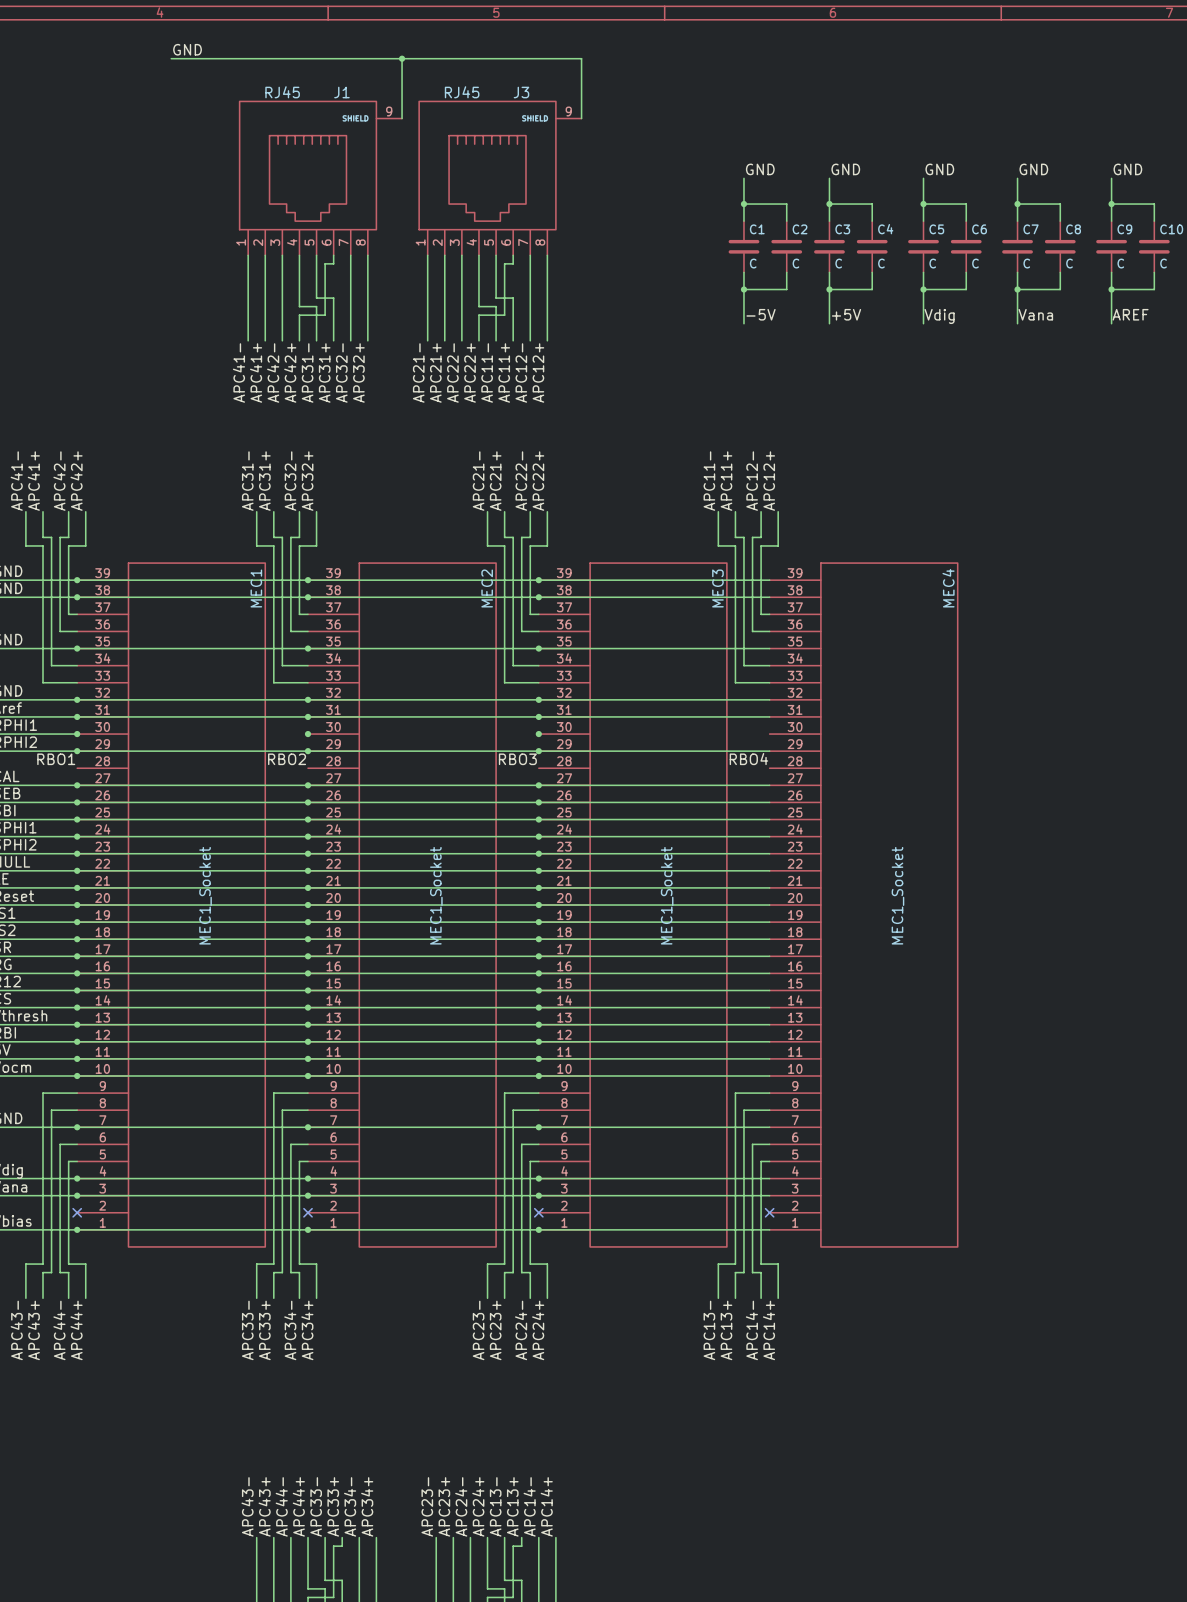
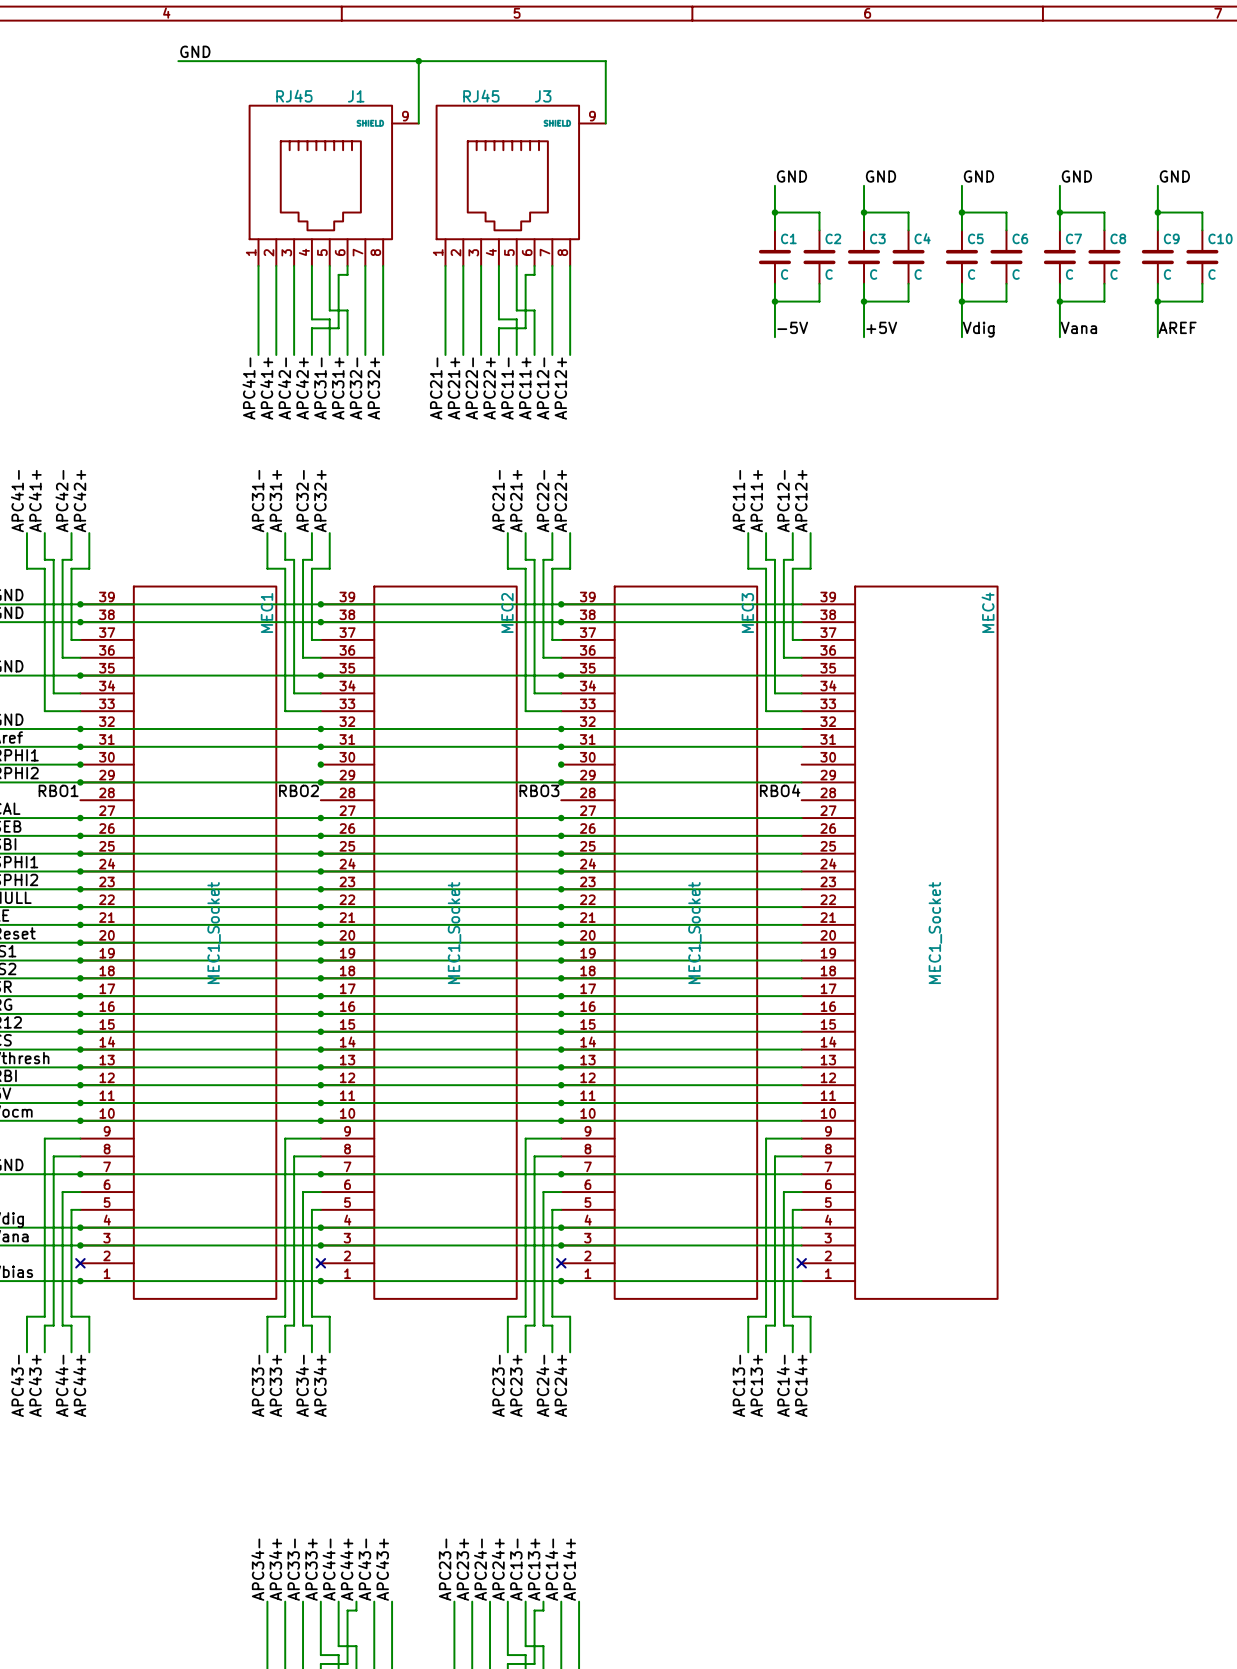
label: APC43- (247, 1506) -> APC34- (257, 1569)
label: APC43+ (264, 1506) -> APC34+ (275, 1569)
label: APC44- (281, 1506) -> APC33- (293, 1569)
label: APC44+ (298, 1506) -> APC33+ (311, 1569)
label: APC33- (316, 1506) -> APC44- (329, 1569)
label: APC33+ (333, 1506) -> APC44+ (346, 1569)
label: APC34- (350, 1506) -> APC43- (364, 1569)
label: APC34+ (367, 1506) -> APC43+ (382, 1569)

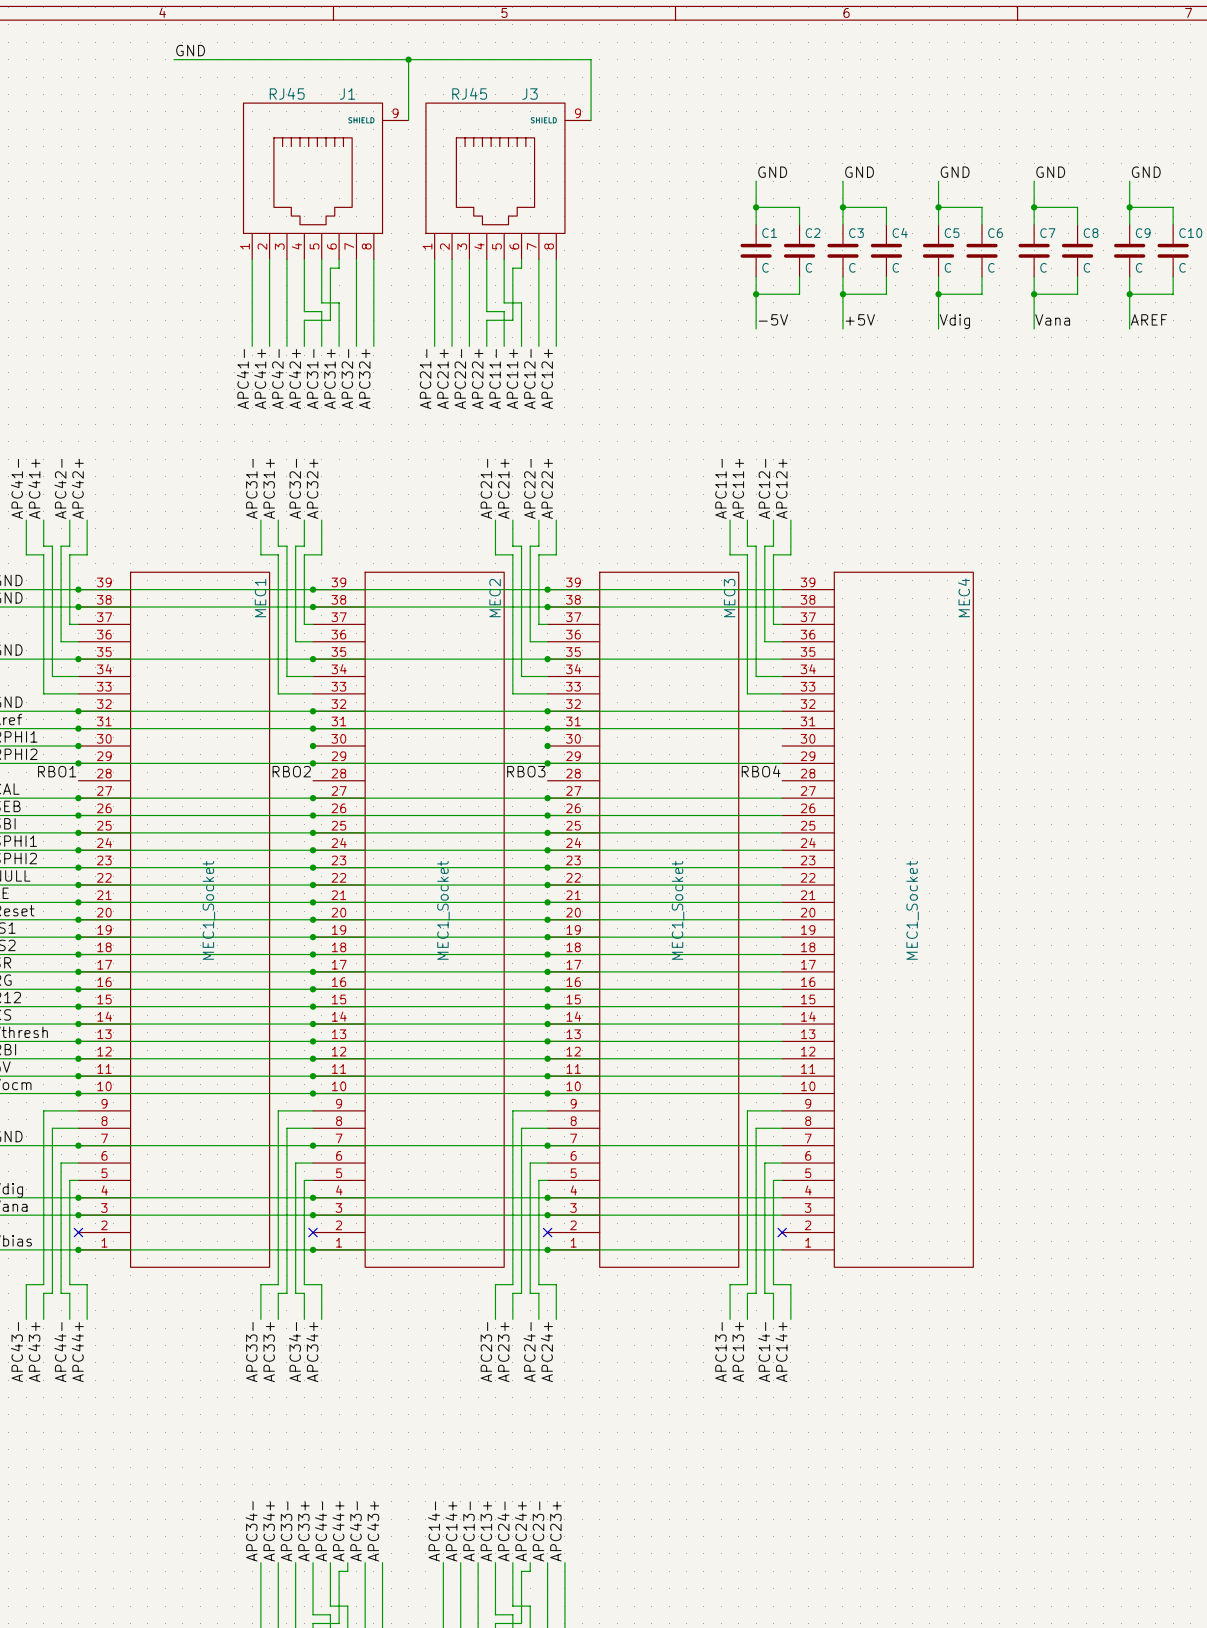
label: APC23- (445, 1569) -> APC14- (434, 1531)
label: APC23+ (462, 1569) -> APC14+ (451, 1531)
label: APC24- (480, 1569) -> APC13- (469, 1531)
label: APC24+ (498, 1569) -> APC13+ (486, 1531)
label: APC13- (516, 1569) -> APC24- (503, 1531)
label: APC13+ (534, 1569) -> APC24+ (520, 1531)
label: APC14- (551, 1569) -> APC23- (538, 1531)
label: APC14+ (569, 1569) -> APC23+ (555, 1531)

